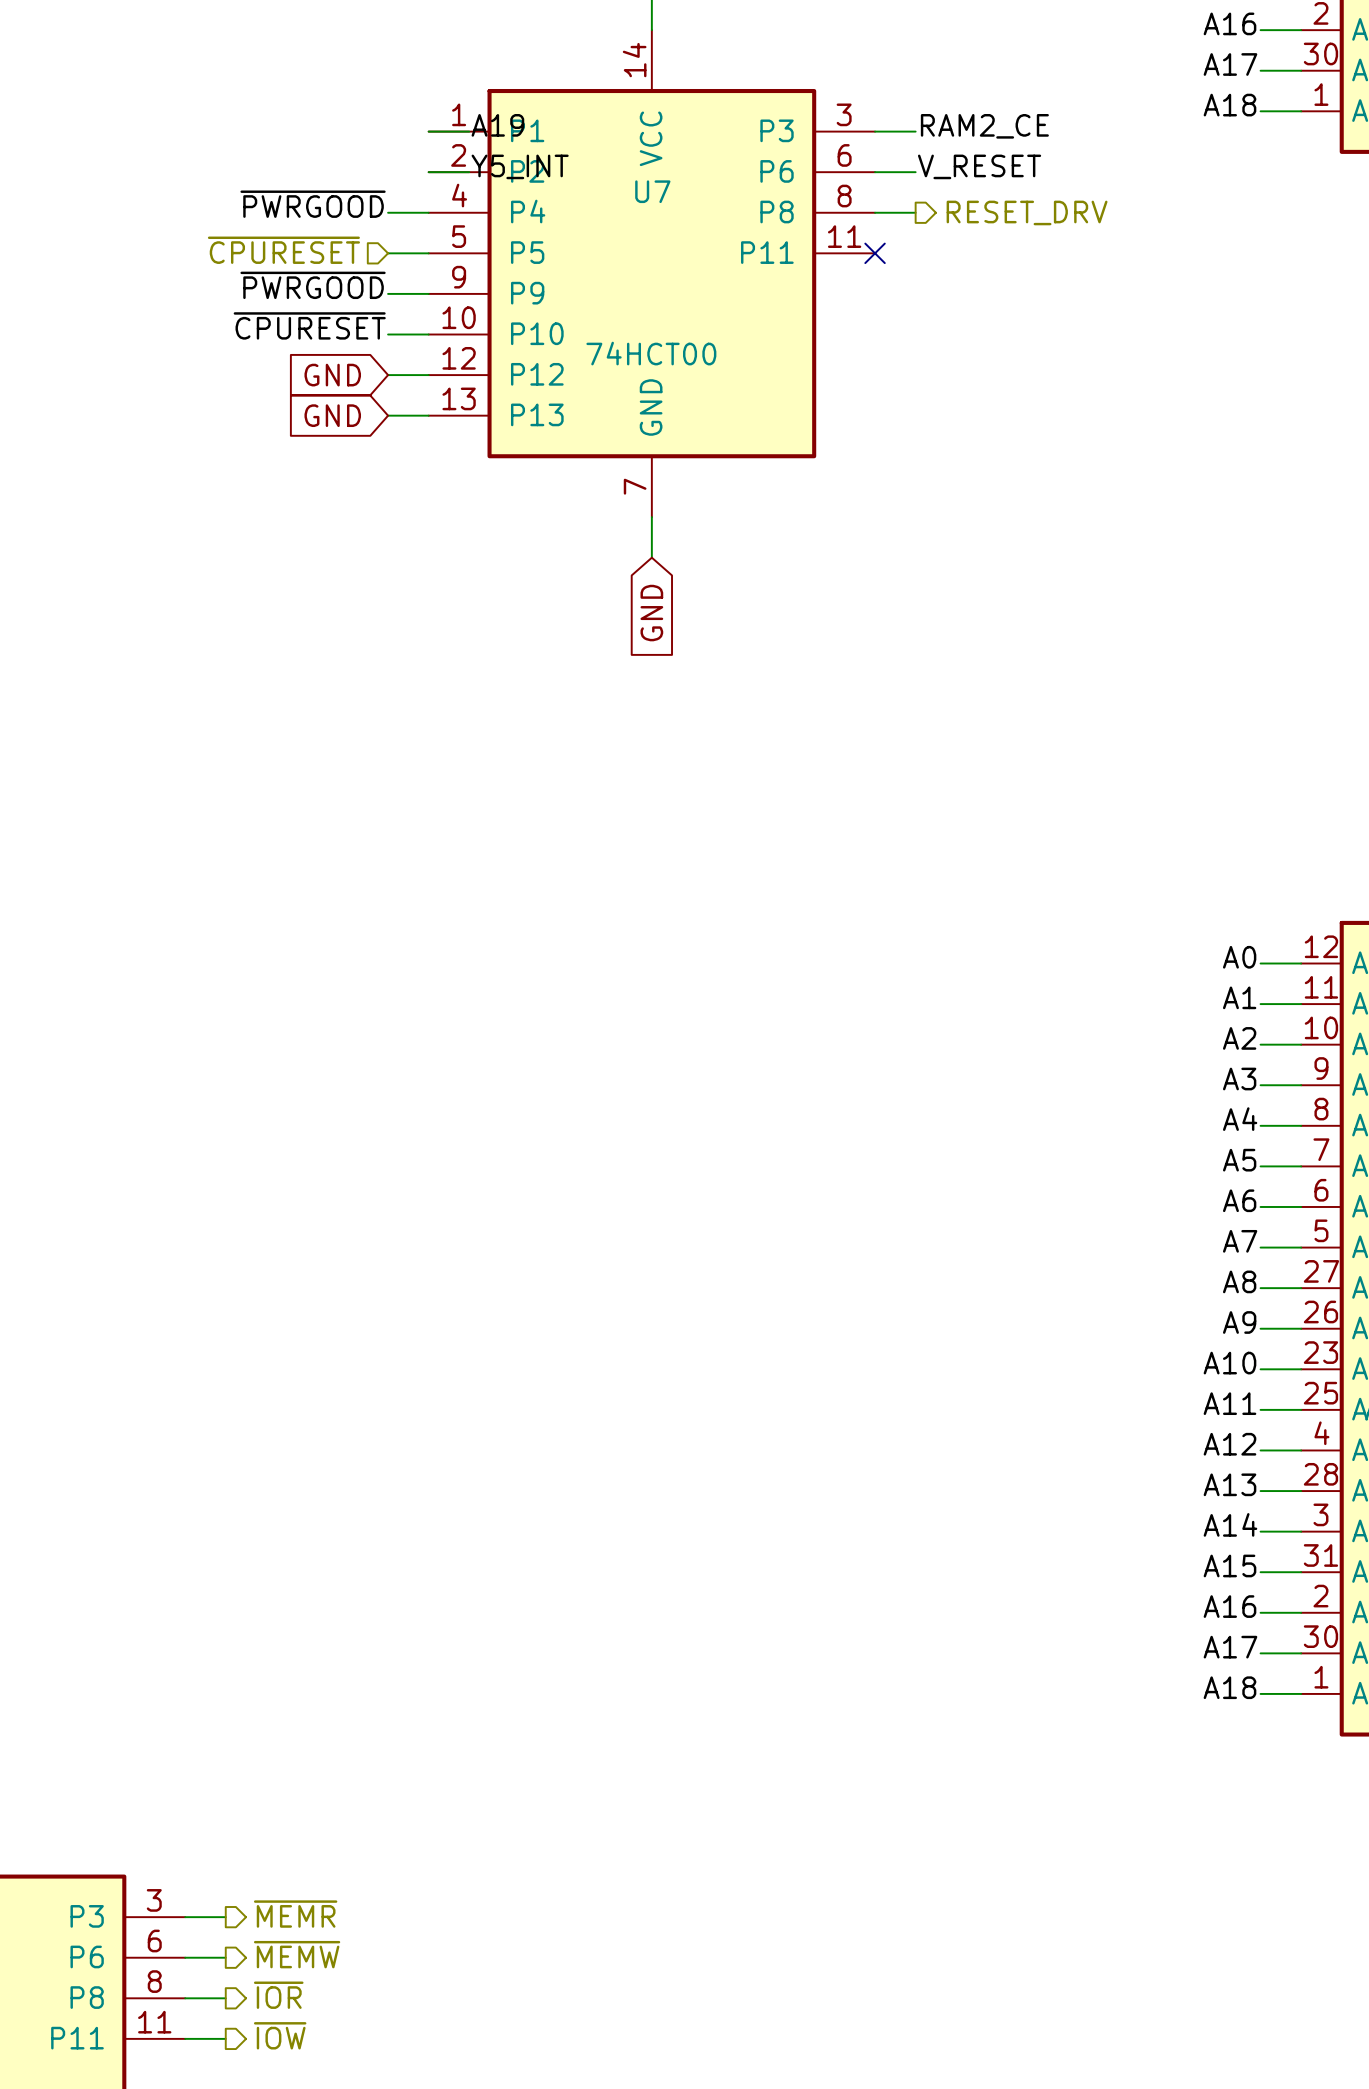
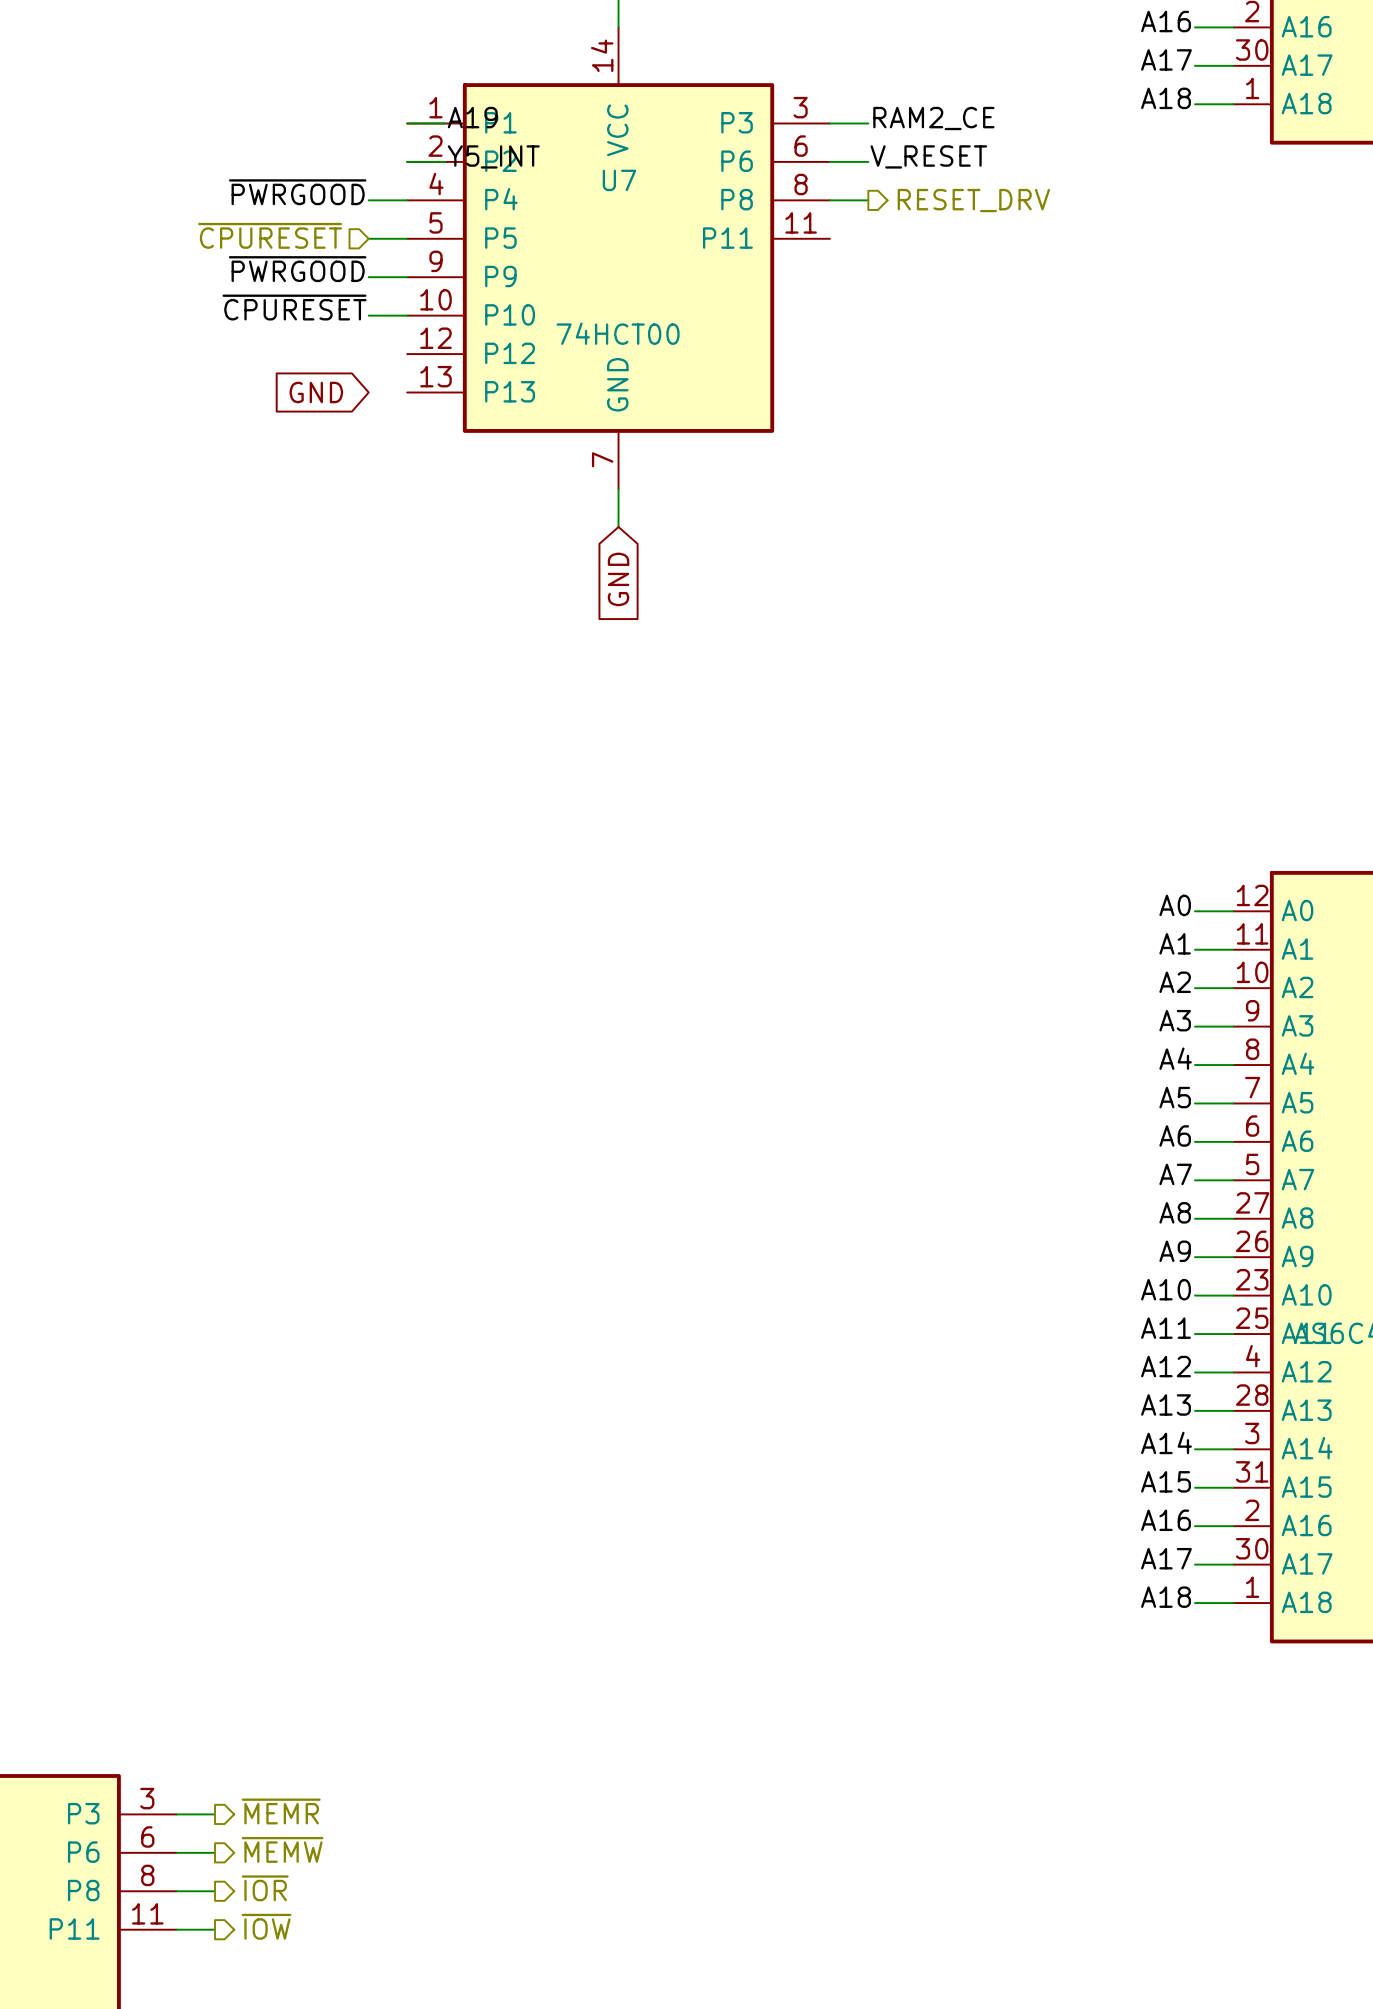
no-connect mark: (875, 253) -> none
global label: GND (332, 375) -> none
wire: (388, 375) (428, 375) -> none
wire: (388, 415) (428, 415) -> none

